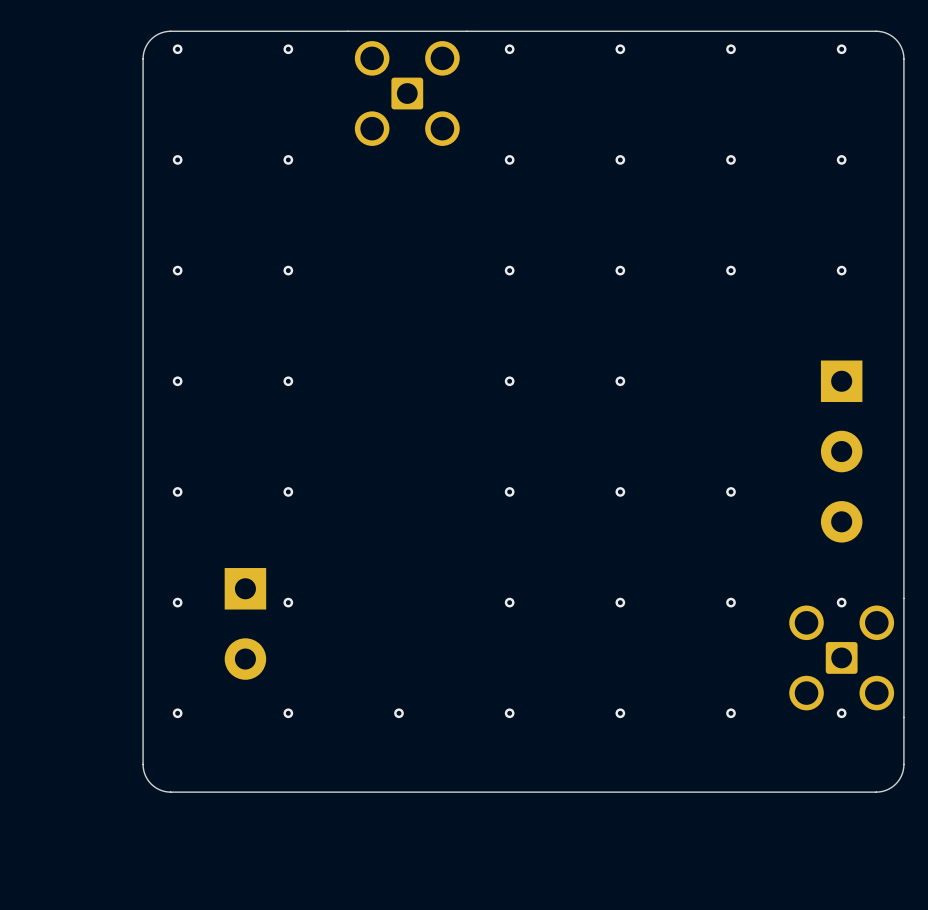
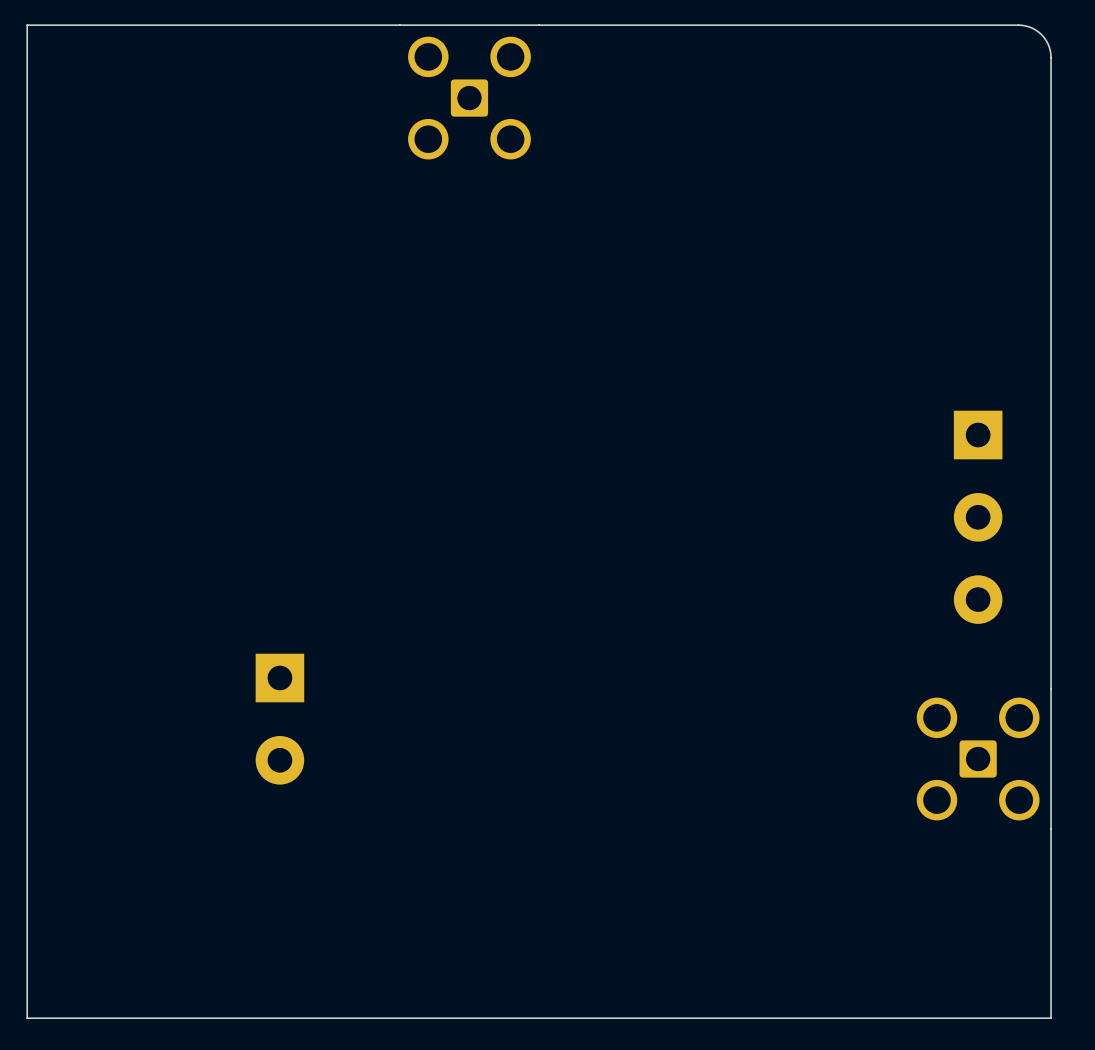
board edge: (170, 31) (161, 32) (151, 39) (144, 49) (143, 58) (143, 764) (144, 773) (151, 784) (161, 790) (170, 792) (876, 792) (885, 790) (895, 784) (902, 773) (903, 764) -> (192, 25) (27, 25) (27, 1018) (1051, 1018) (1051, 883)
via: (177, 49) -> none
via: (288, 49) -> none
via: (509, 49) -> none
via: (620, 49) -> none
via: (731, 49) -> none
via: (841, 49) -> none
via: (177, 159) -> none
via: (288, 159) -> none
via: (509, 159) -> none
via: (620, 159) -> none
via: (731, 159) -> none
via: (841, 159) -> none
via: (177, 270) -> none
via: (288, 270) -> none
via: (509, 270) -> none
via: (620, 270) -> none
via: (731, 270) -> none
via: (841, 270) -> none
via: (177, 381) -> none
via: (288, 381) -> none
via: (509, 381) -> none
via: (620, 381) -> none
via: (177, 491) -> none
via: (288, 491) -> none
via: (509, 491) -> none
via: (620, 491) -> none
via: (731, 491) -> none
via: (177, 602) -> none
via: (288, 602) -> none
via: (509, 602) -> none
via: (620, 602) -> none
via: (731, 602) -> none
via: (841, 602) -> none
via: (177, 713) -> none
via: (288, 713) -> none
via: (398, 713) -> none
via: (509, 713) -> none
via: (620, 713) -> none
via: (731, 713) -> none
via: (841, 713) -> none

